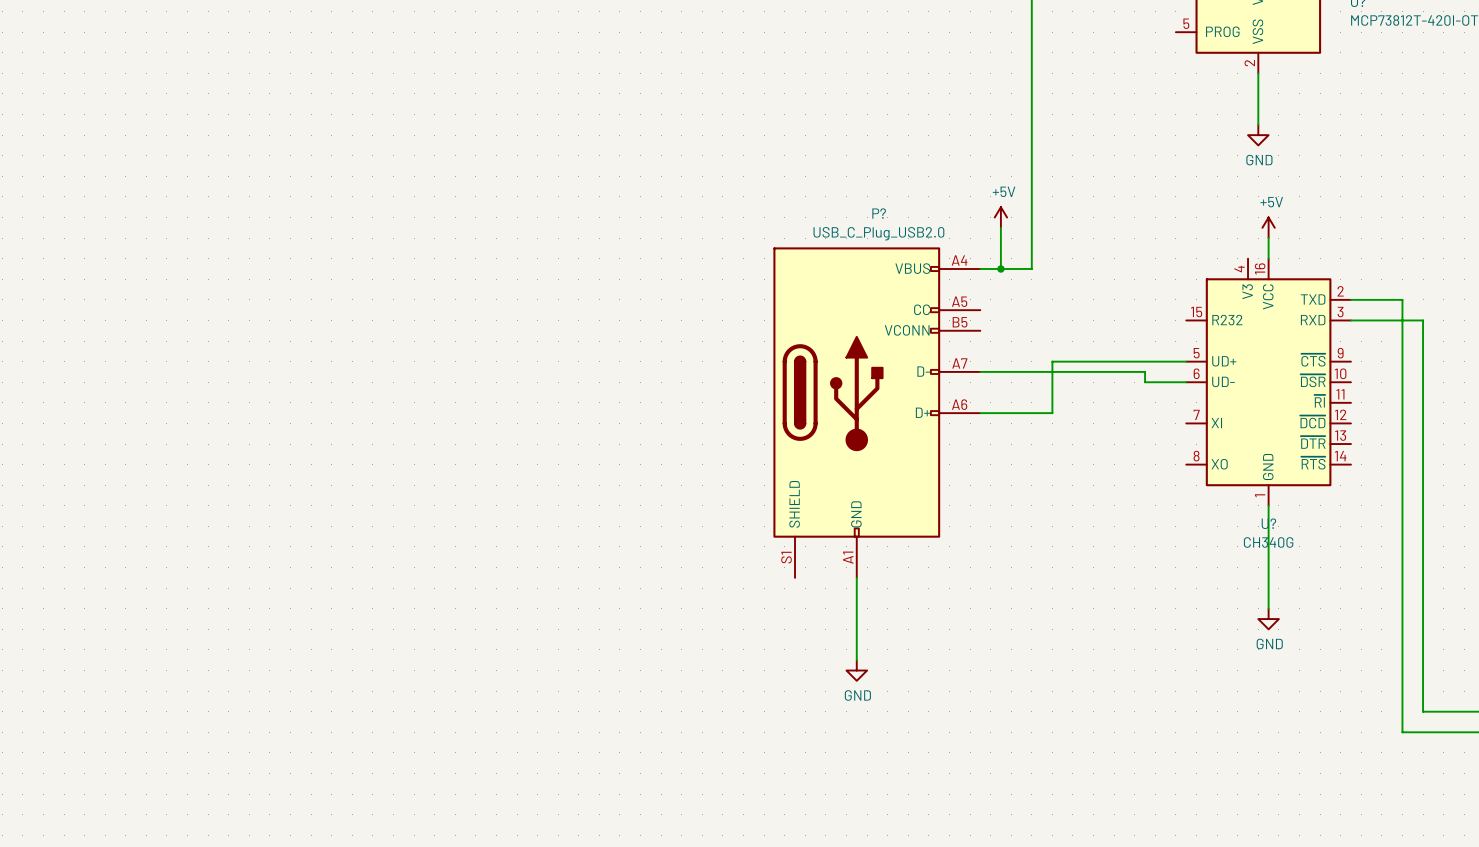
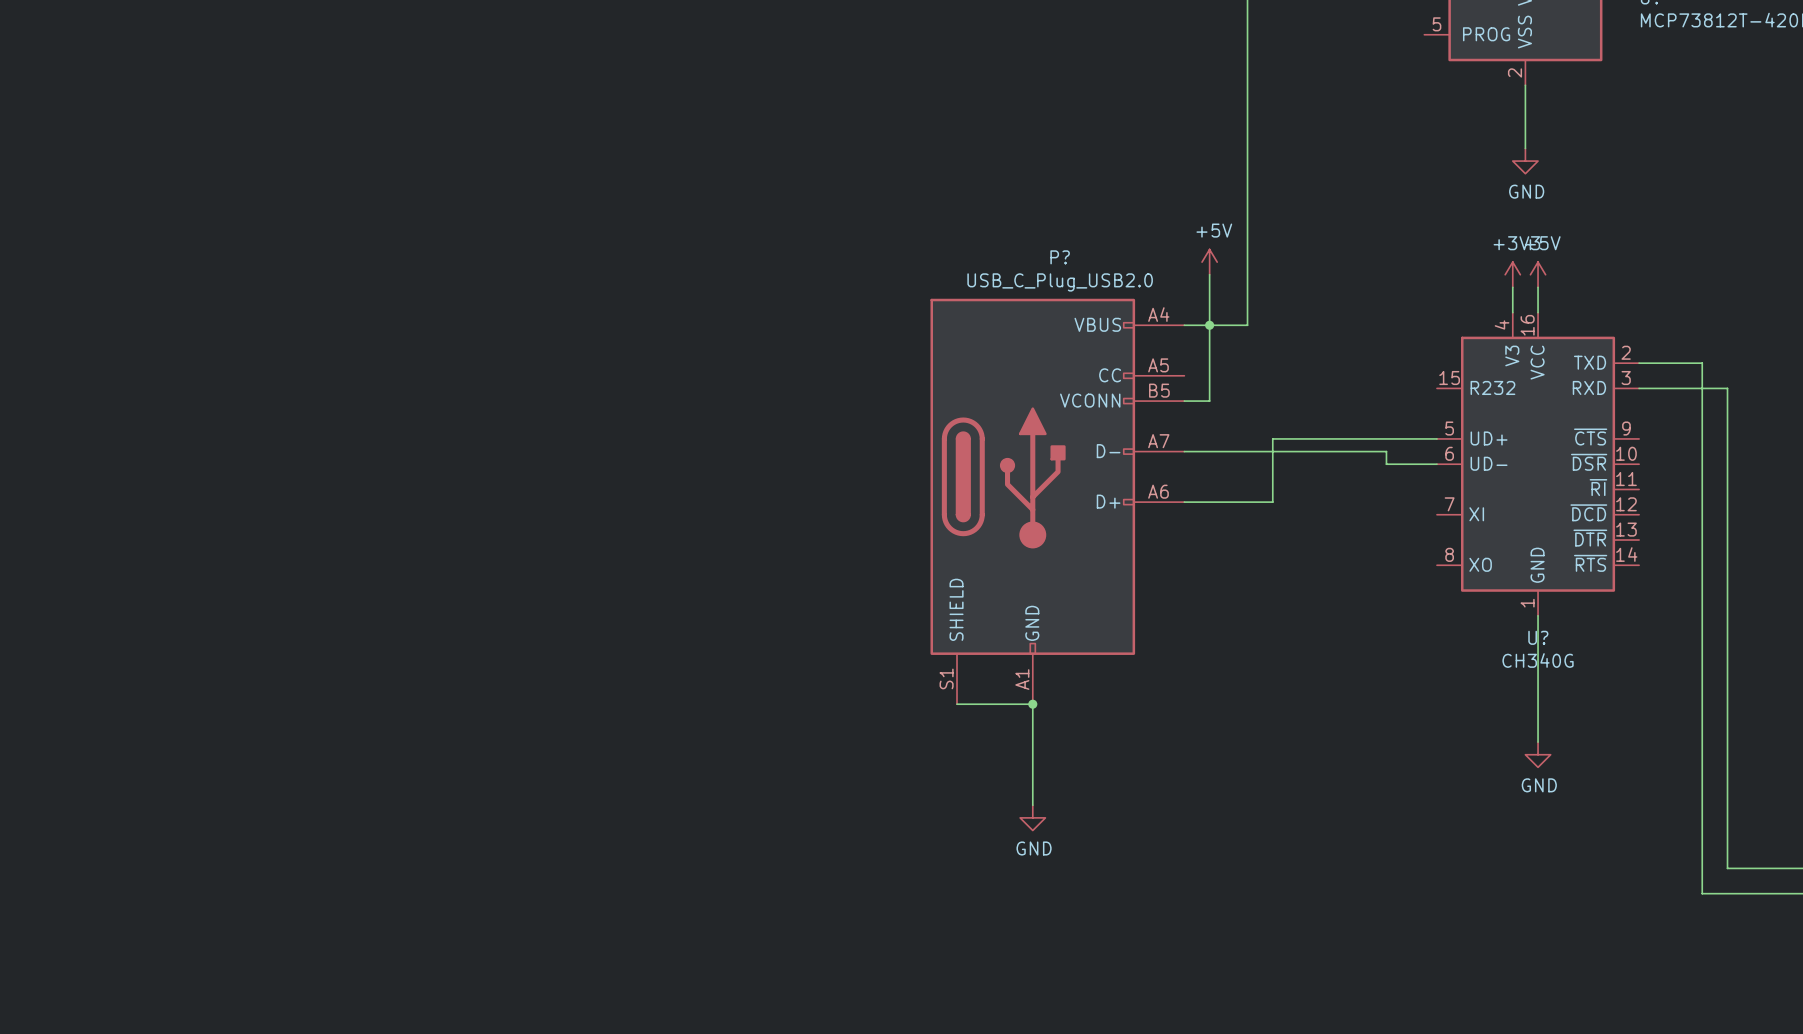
power symbol: none -> +3V3 (1512, 274)
wire: none -> (1512, 287) (1512, 312)
wire: none -> (1209, 325) (1209, 401) (1184, 401)
wire: none -> (957, 704) (1032, 704)
junction: none -> (1032, 704)

